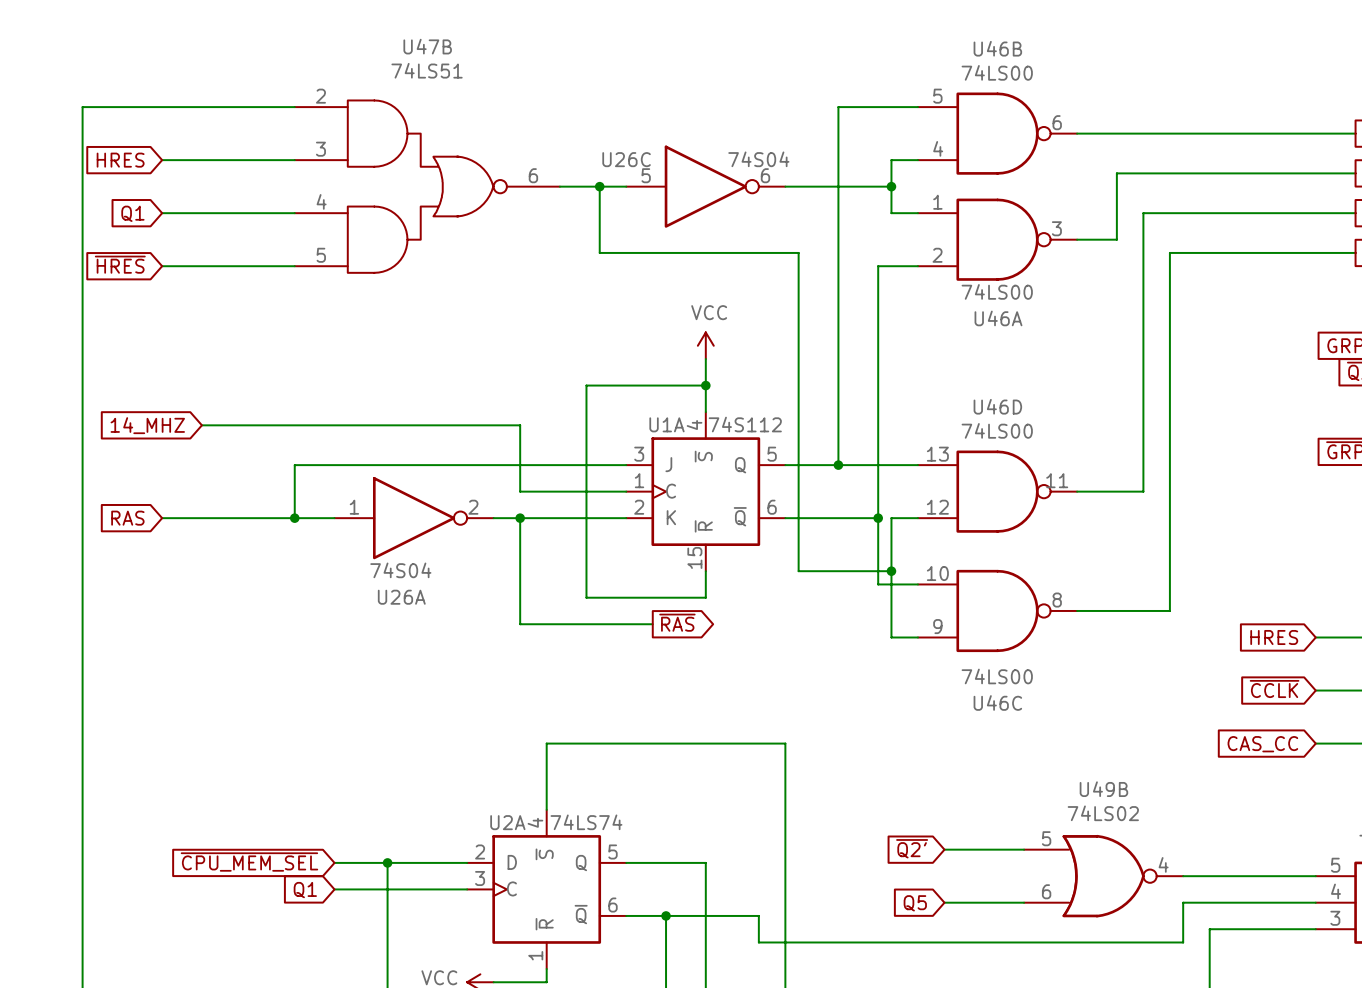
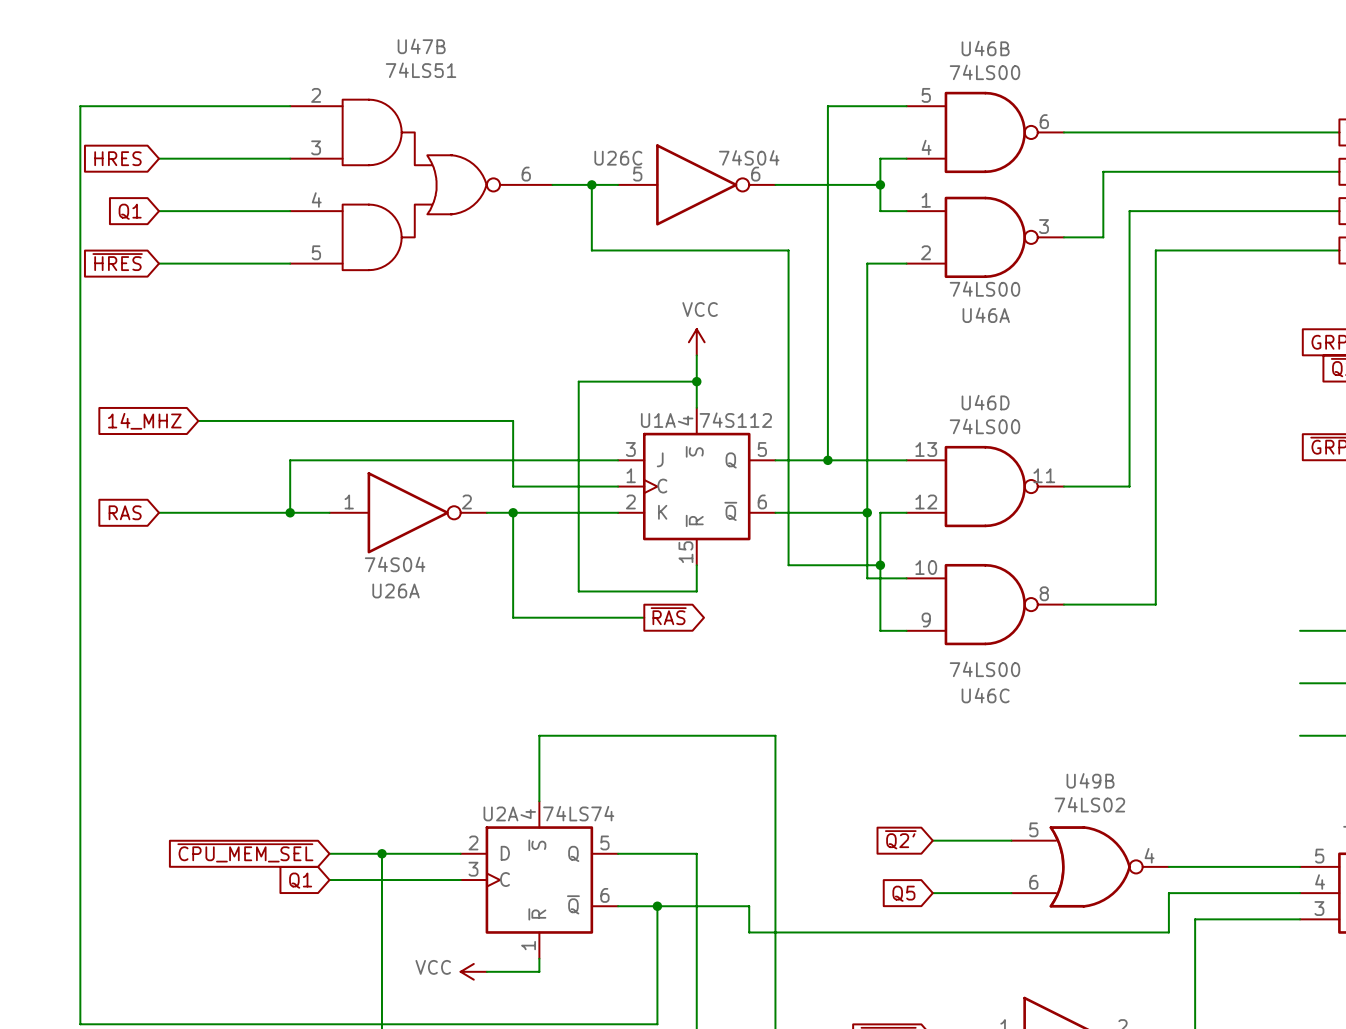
global label: HRES (1274, 637) -> none
global label: ~{CCLK} (1274, 689) -> none
global label: CAS_CC (1262, 744) -> none

